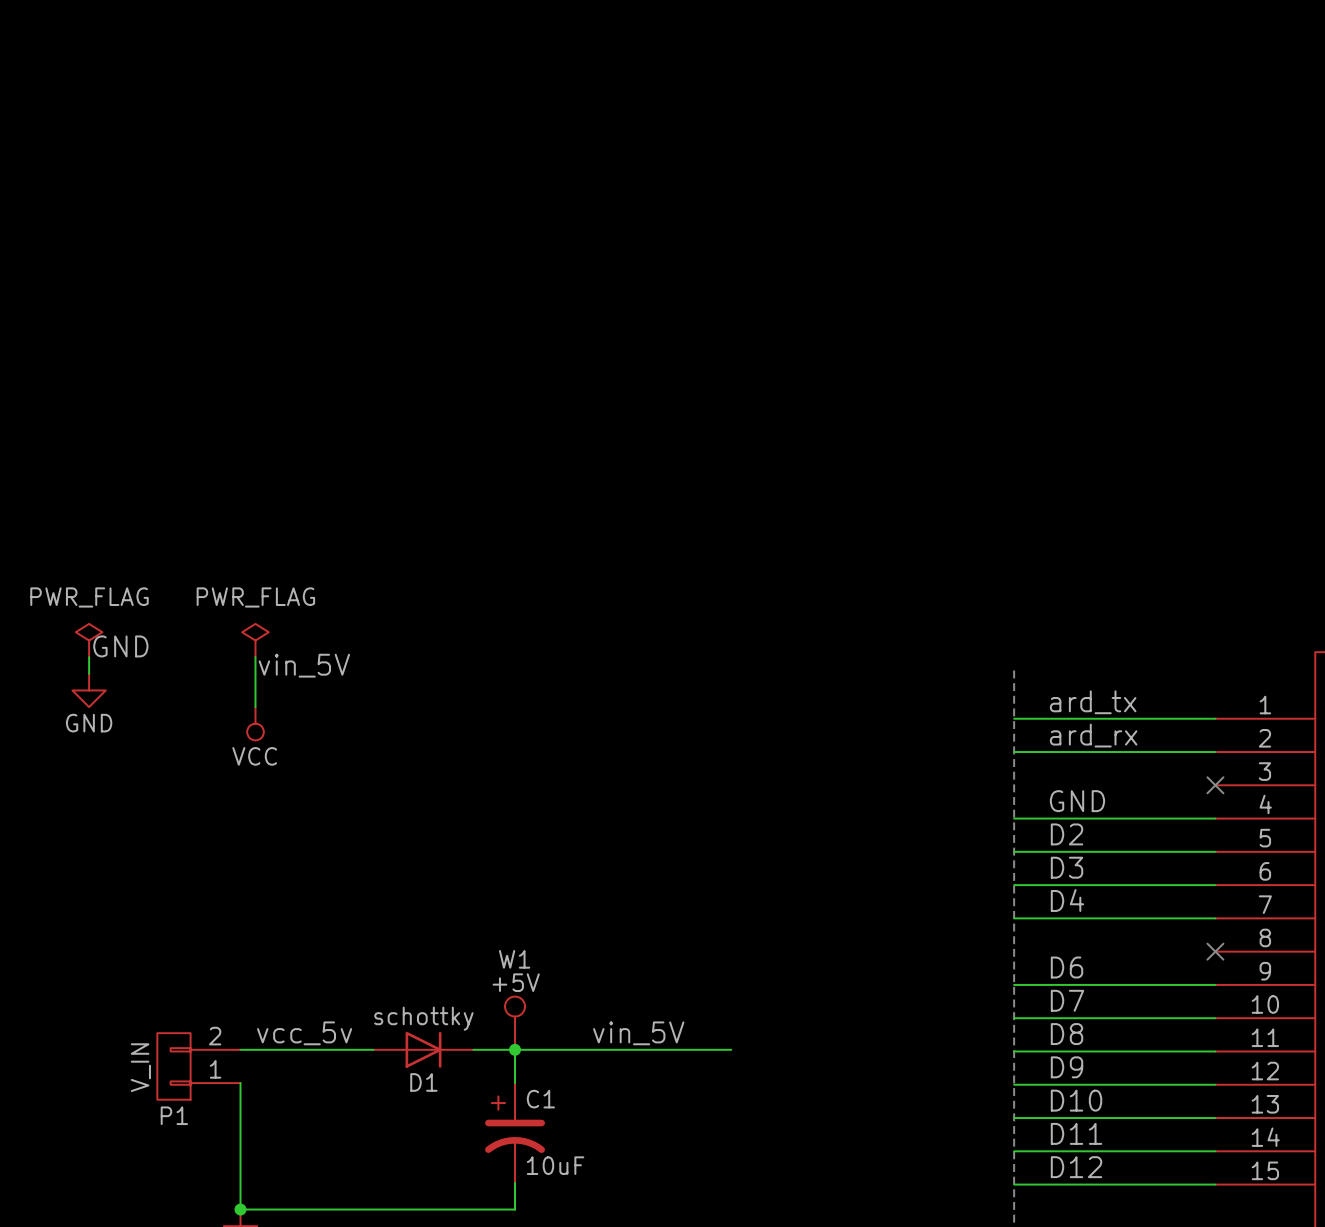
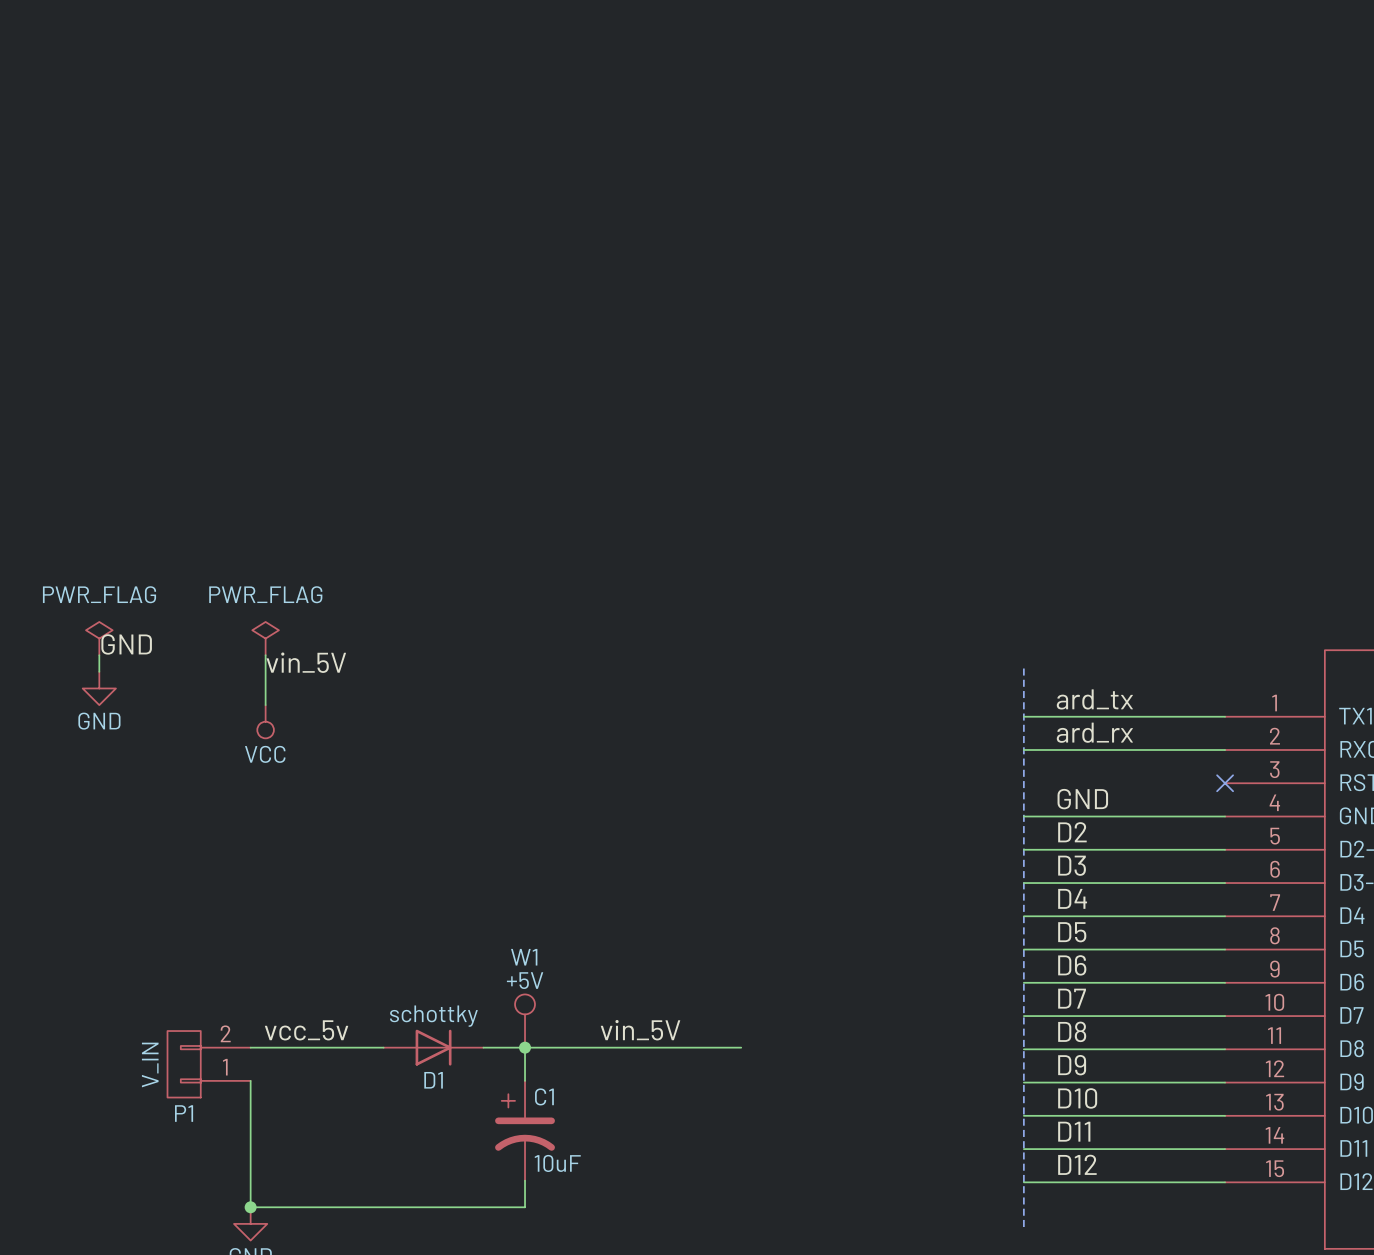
label: none -> D5 (1072, 932)
wire: none -> (1023, 949) (1225, 949)
no-connect mark: (1215, 951) -> none

